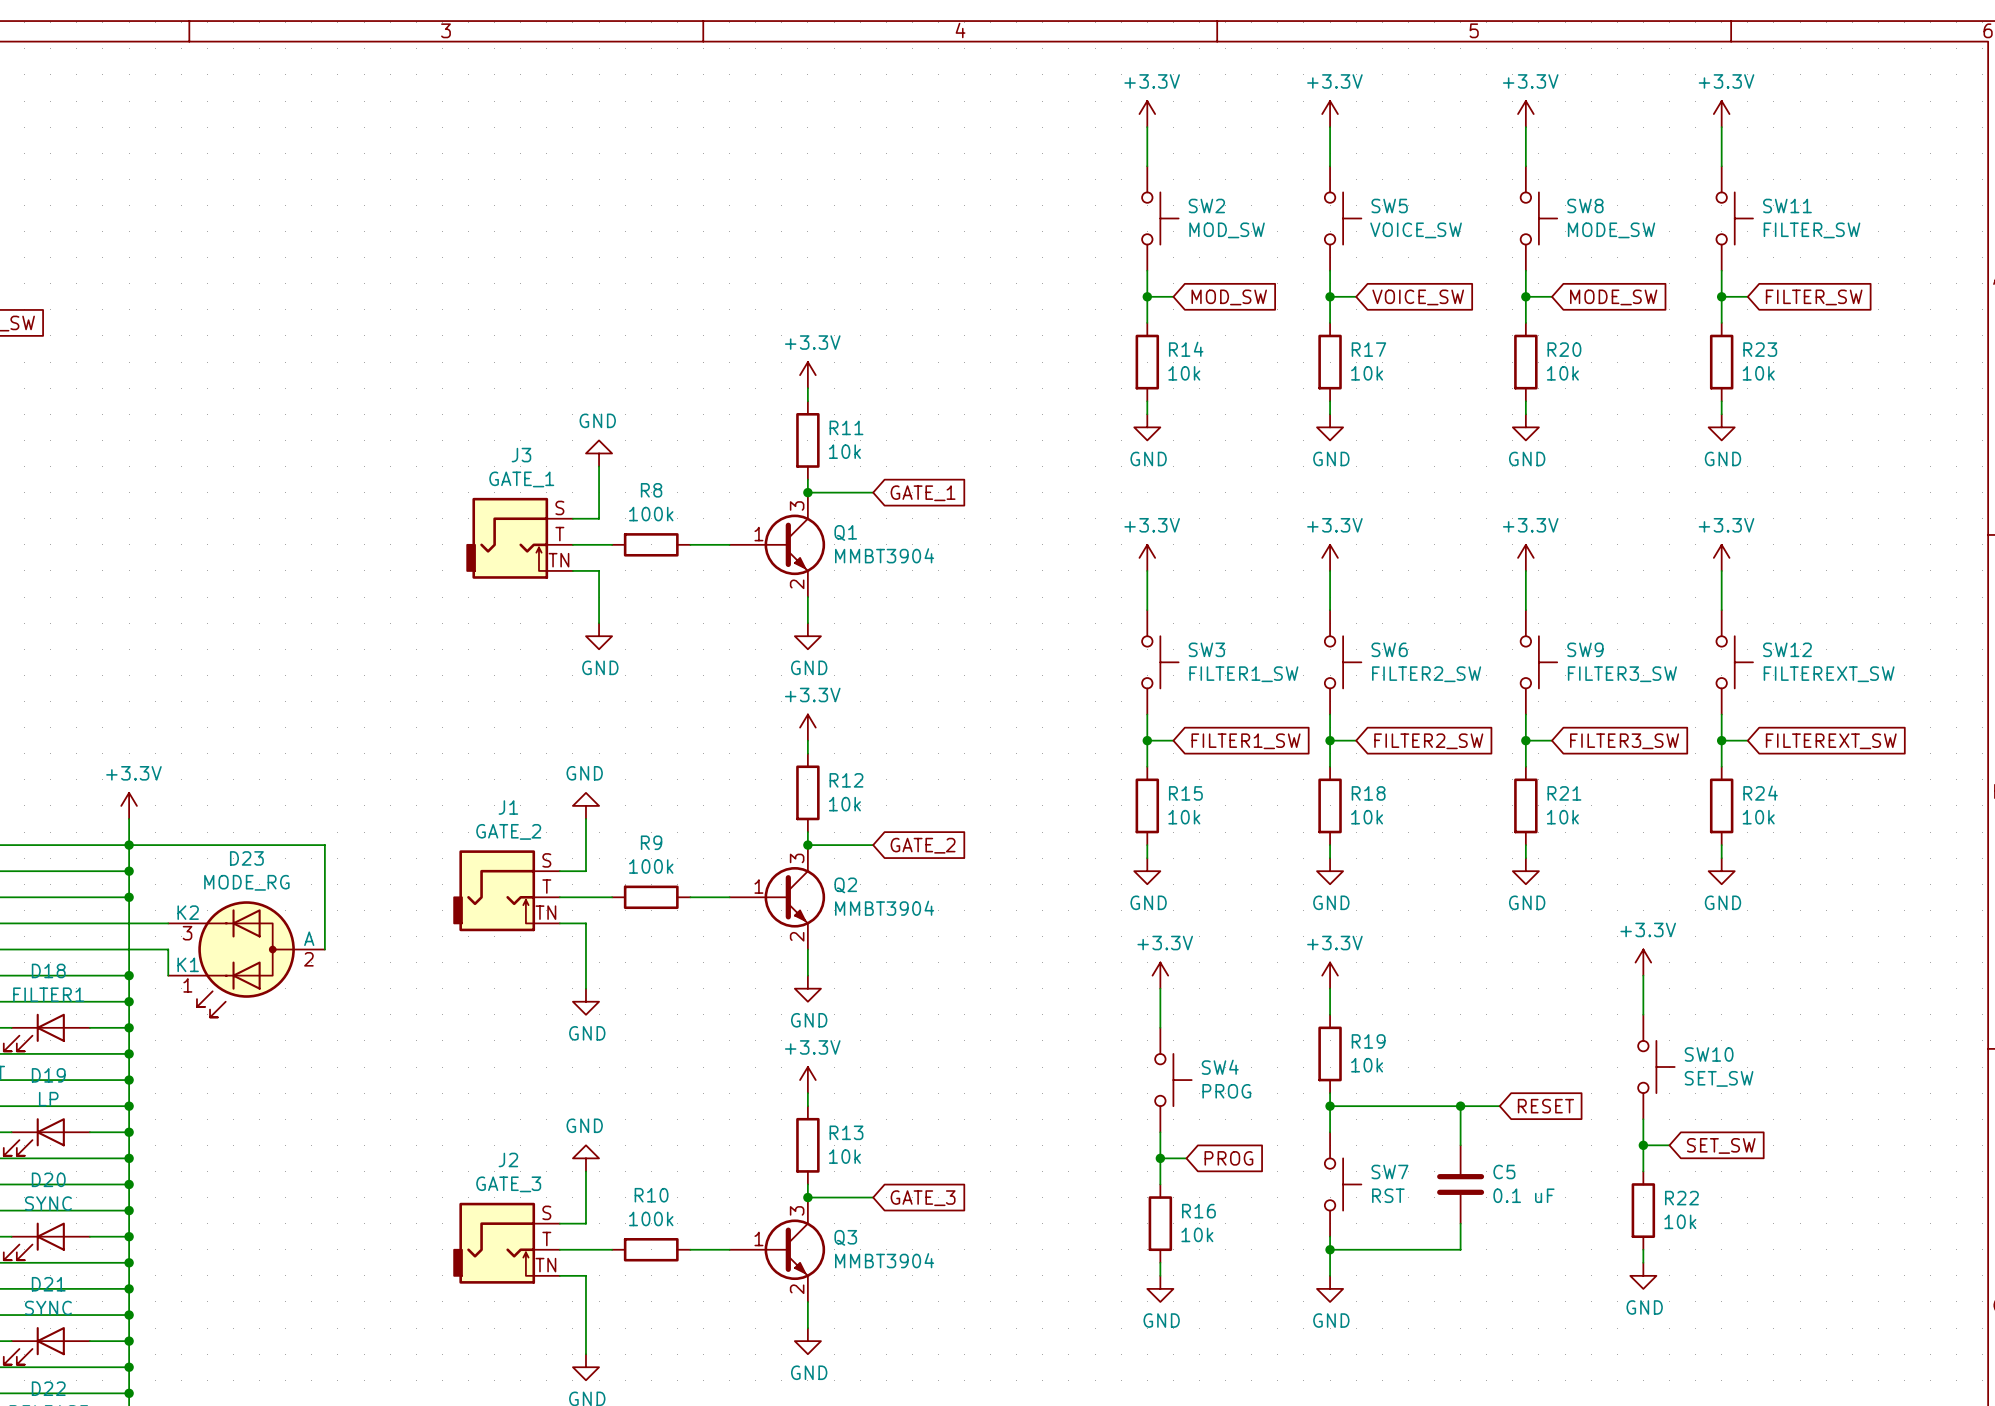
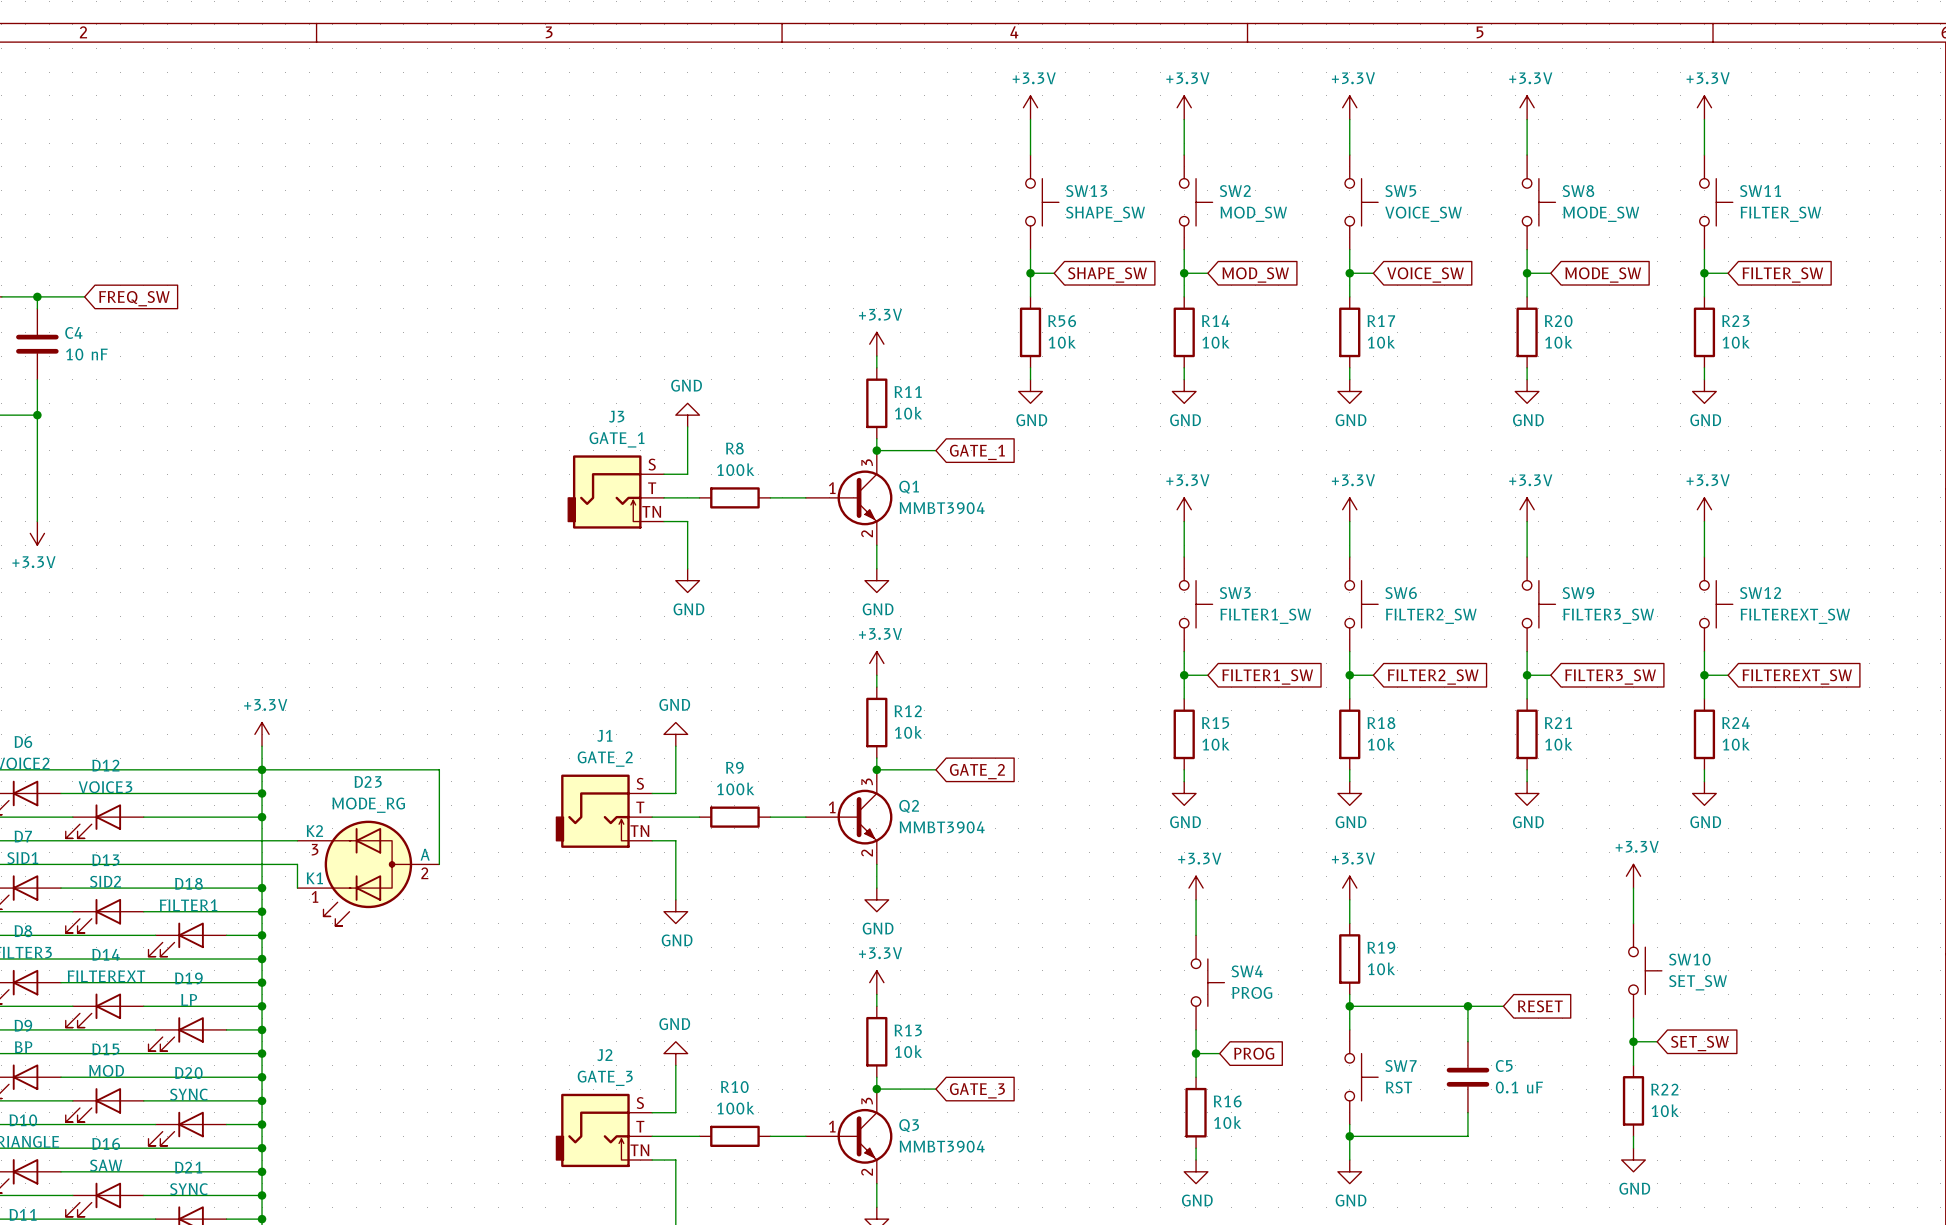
power symbol: none -> +3.3V (1030, 107)
wire: none -> (1030, 119) (1030, 155)
SW13: none -> SHAPE_SW (1042, 202)
wire: none -> (1030, 249) (1030, 296)
wire: none -> (1030, 273) (1054, 273)
junction: none -> (1030, 273)
global label: none -> SHAPE_SW (1107, 275)
R56: none -> 10k (1030, 332)
wire: none -> (1030, 367) (1030, 379)
power symbol: none -> GND (1030, 391)

